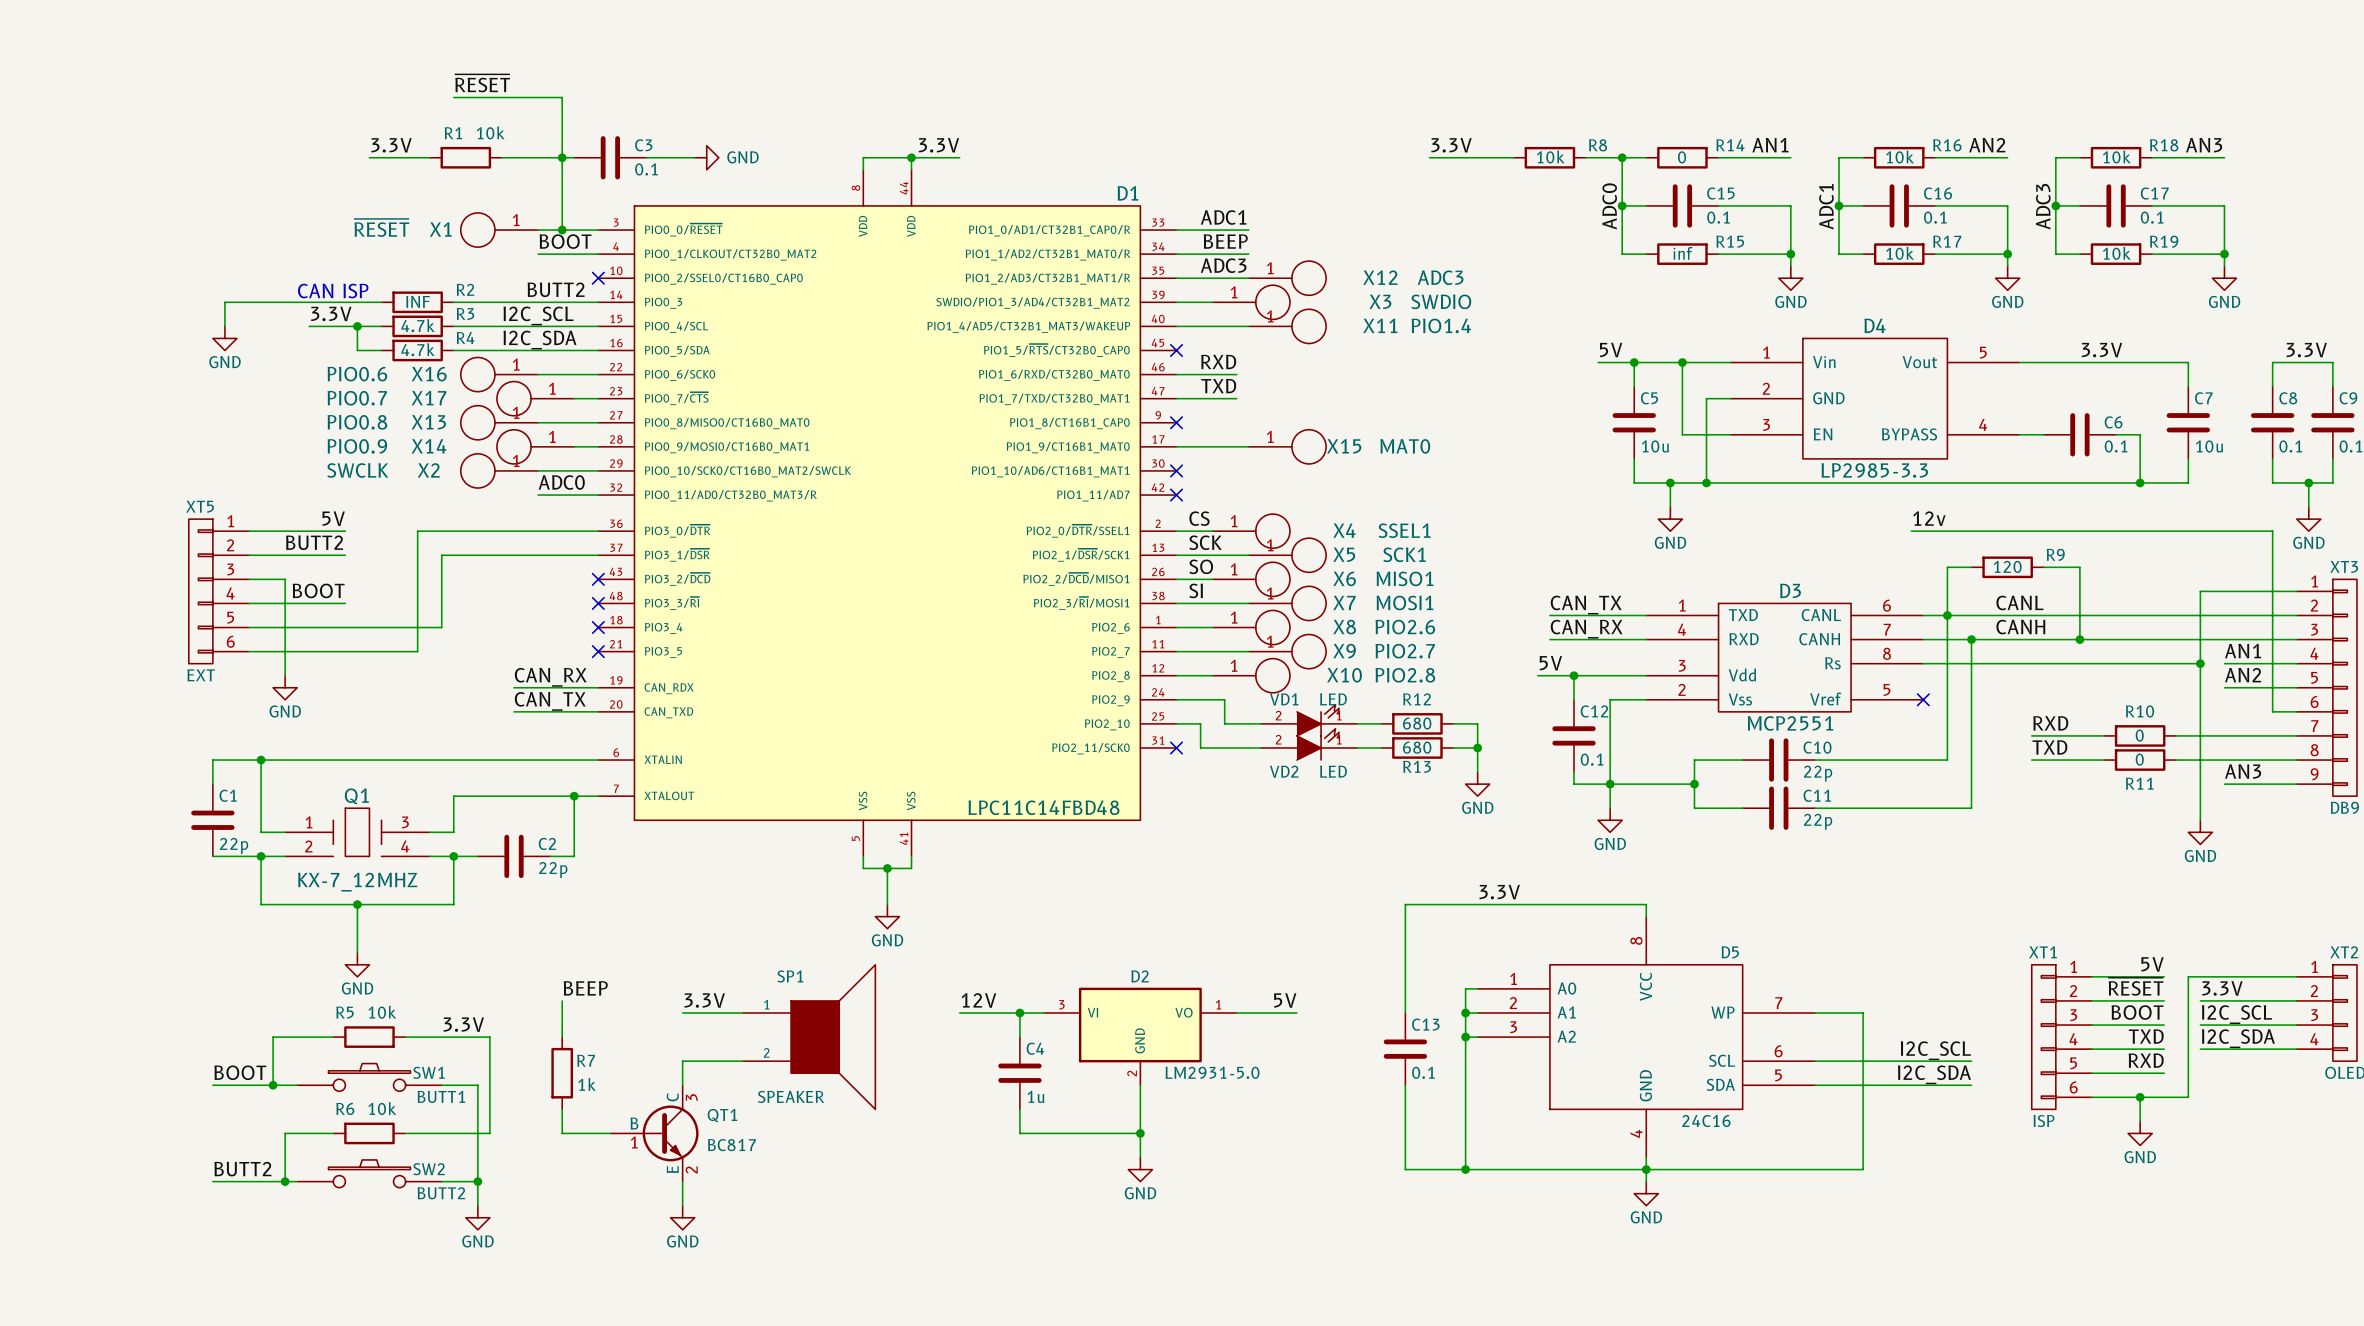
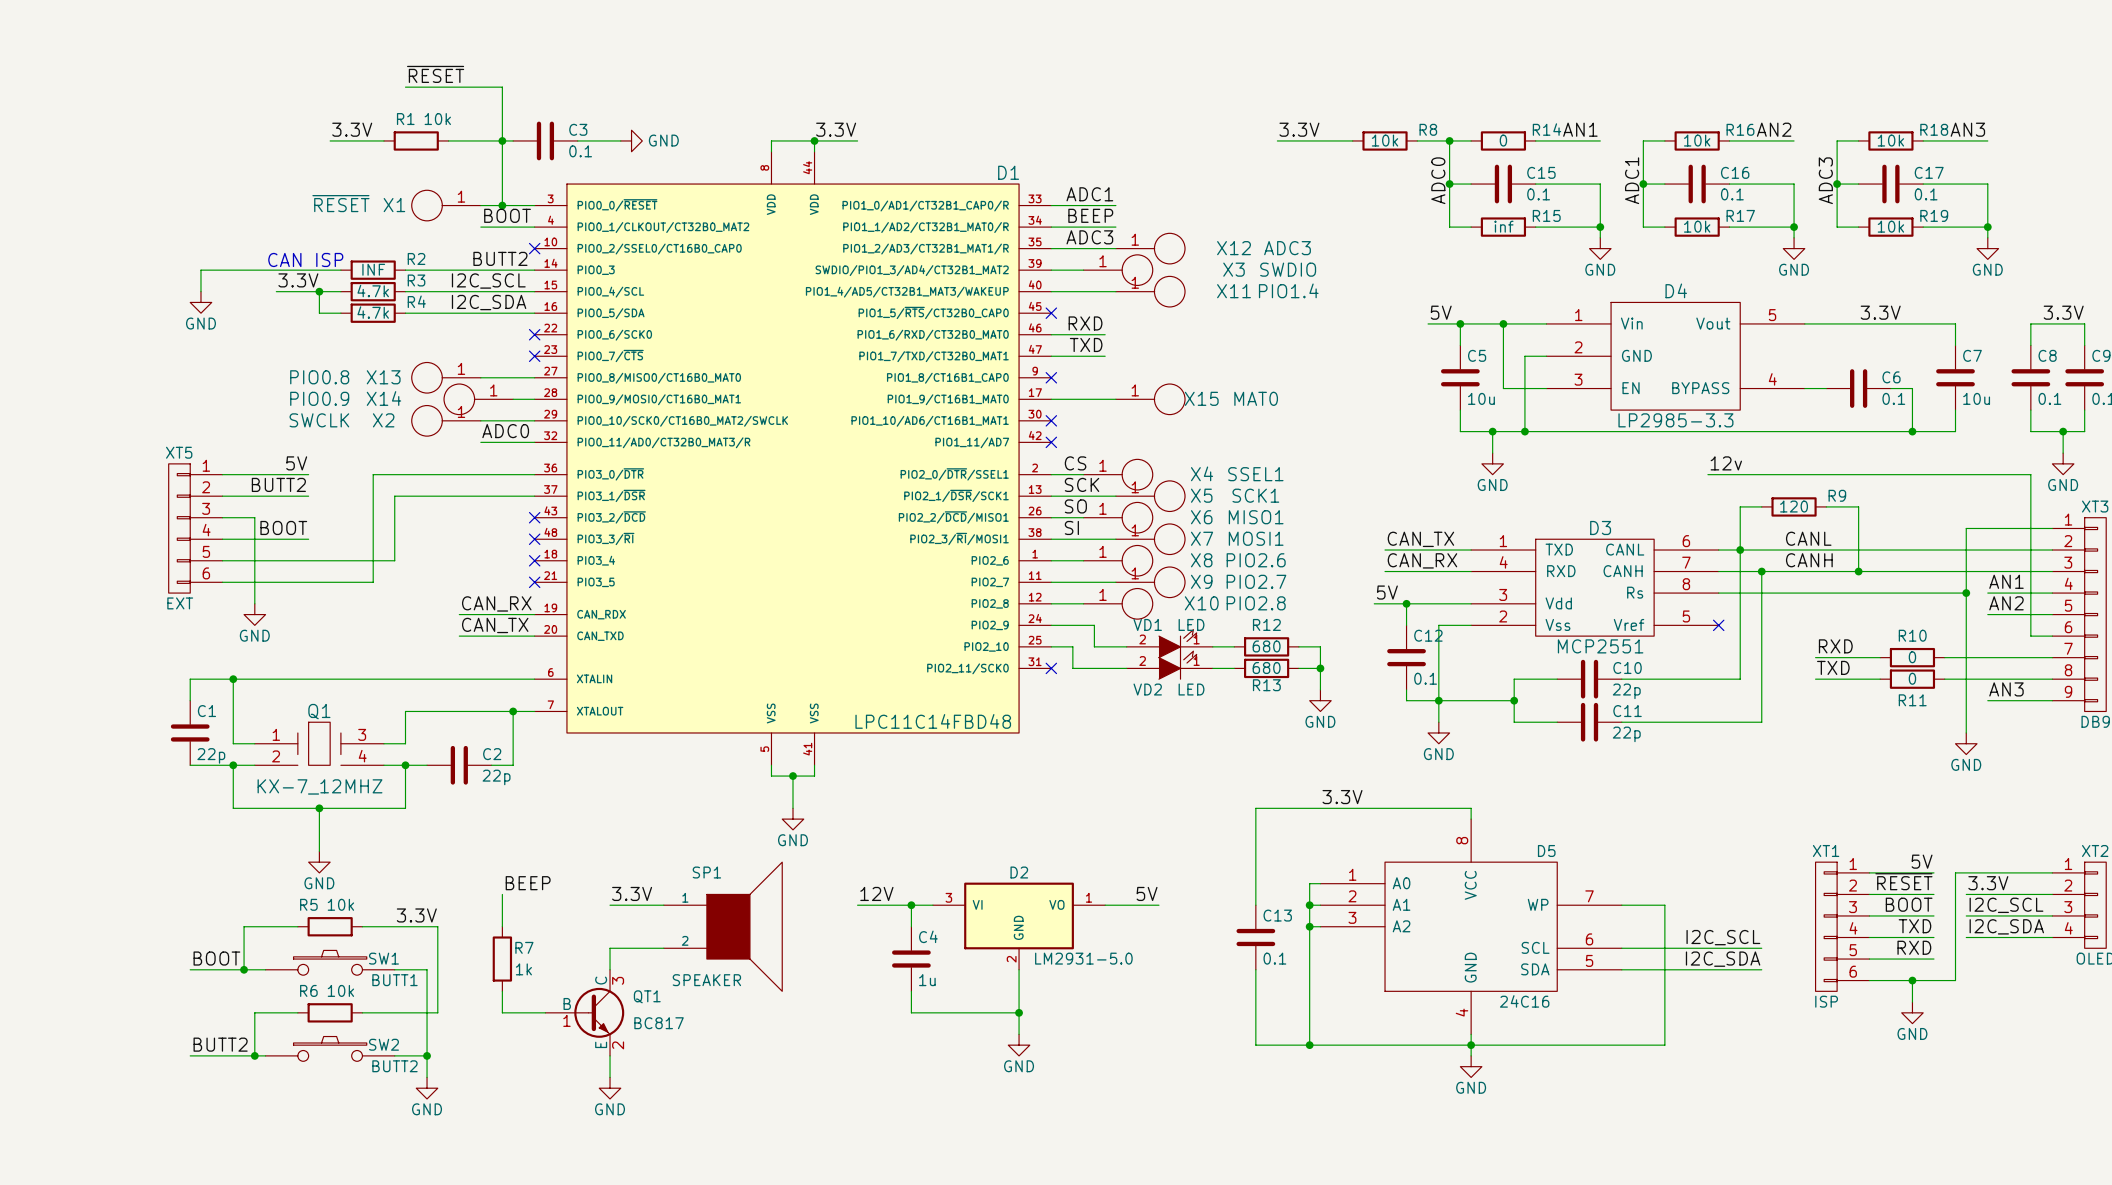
X16: PIO0.6 (499, 374) -> none
wire: (538, 374) (598, 374) -> none
no-connect mark: none -> (534, 334)
X17: PIO0.7 (535, 398) -> none
wire: (574, 398) (598, 398) -> none
no-connect mark: none -> (534, 356)

